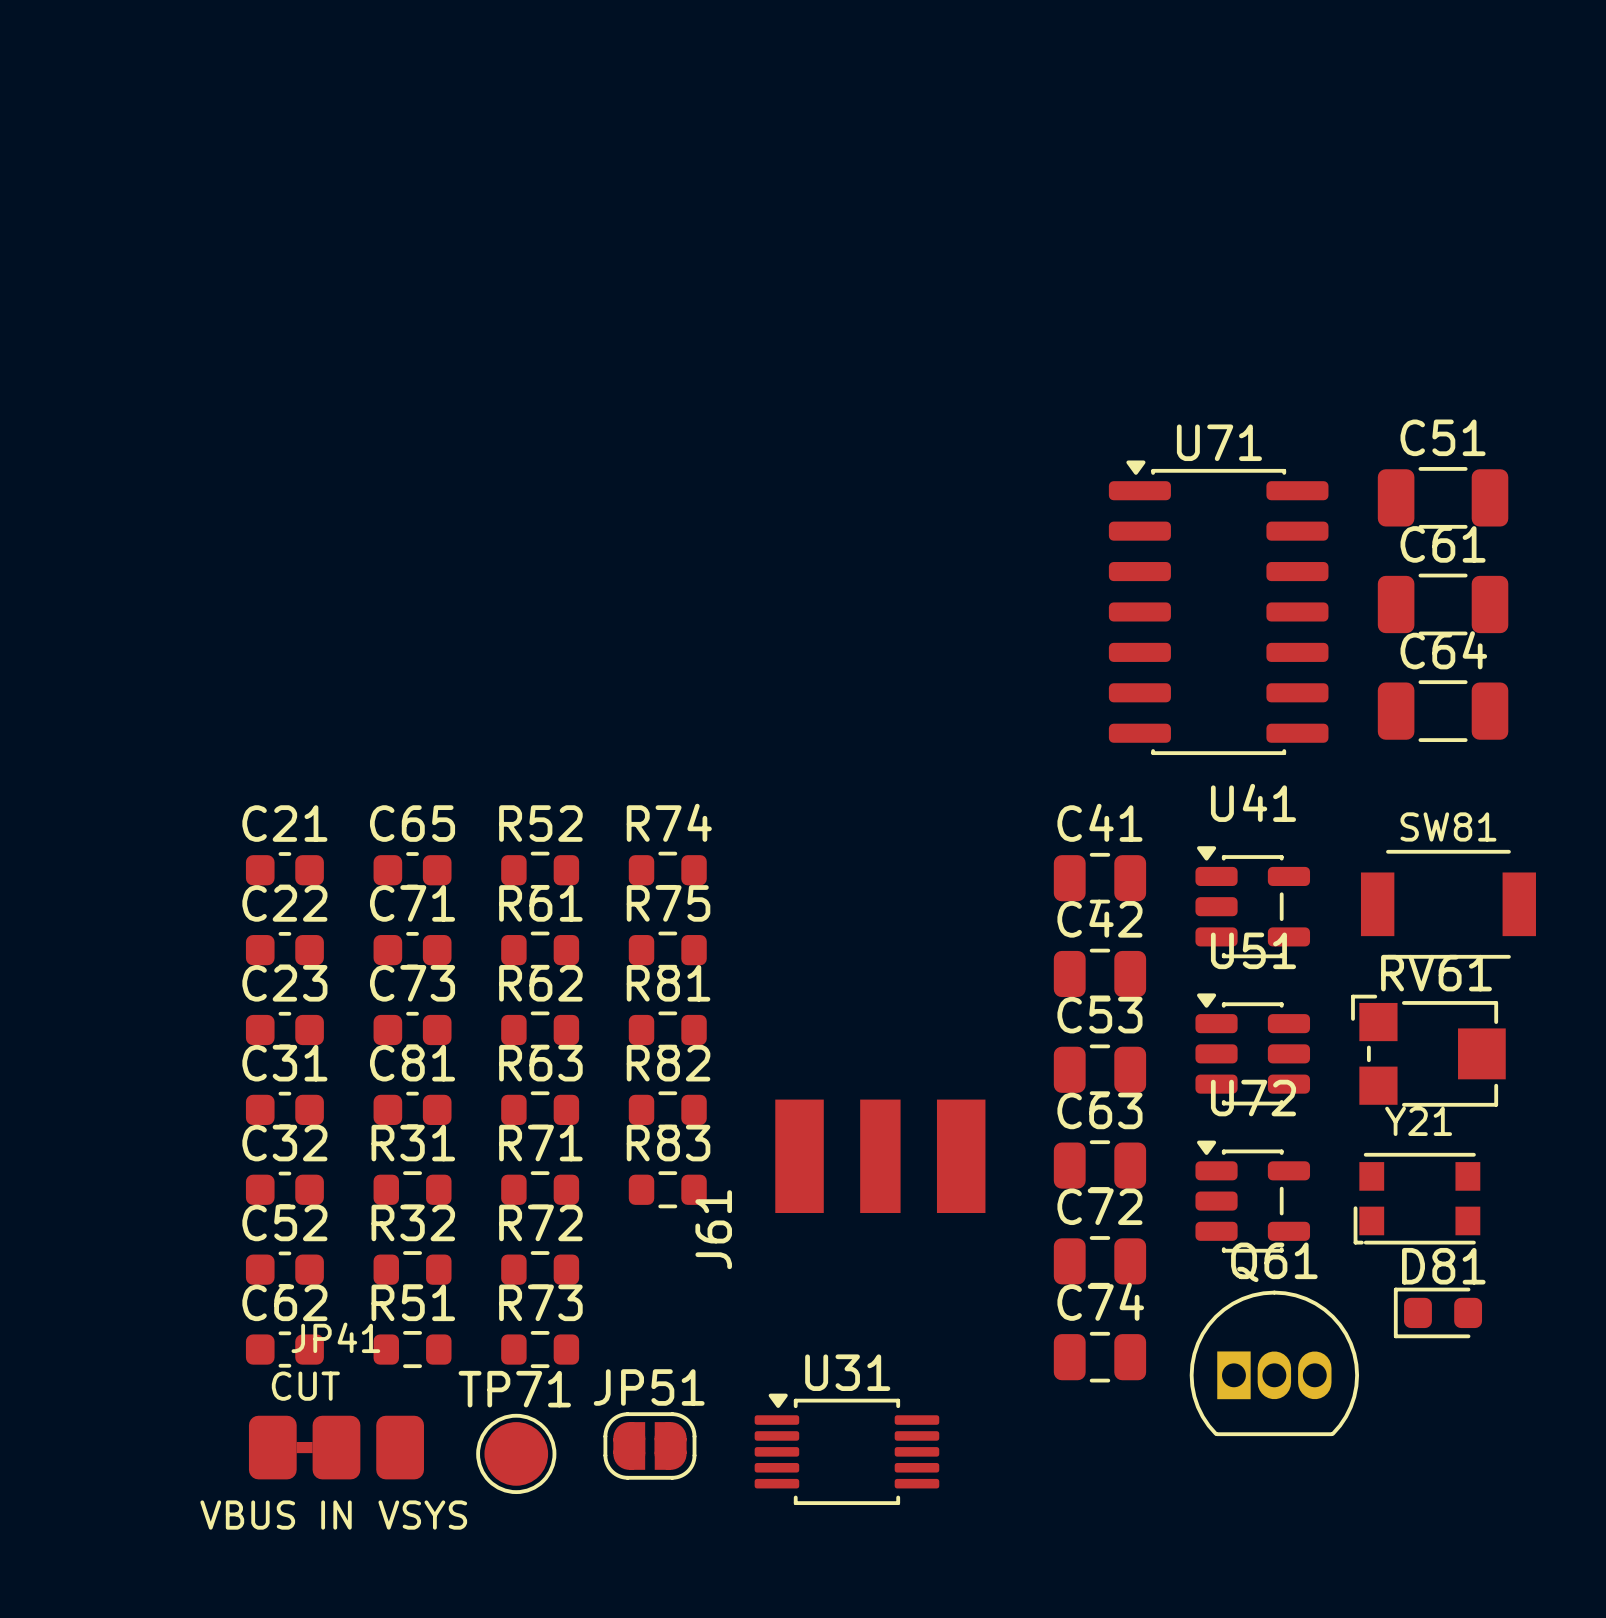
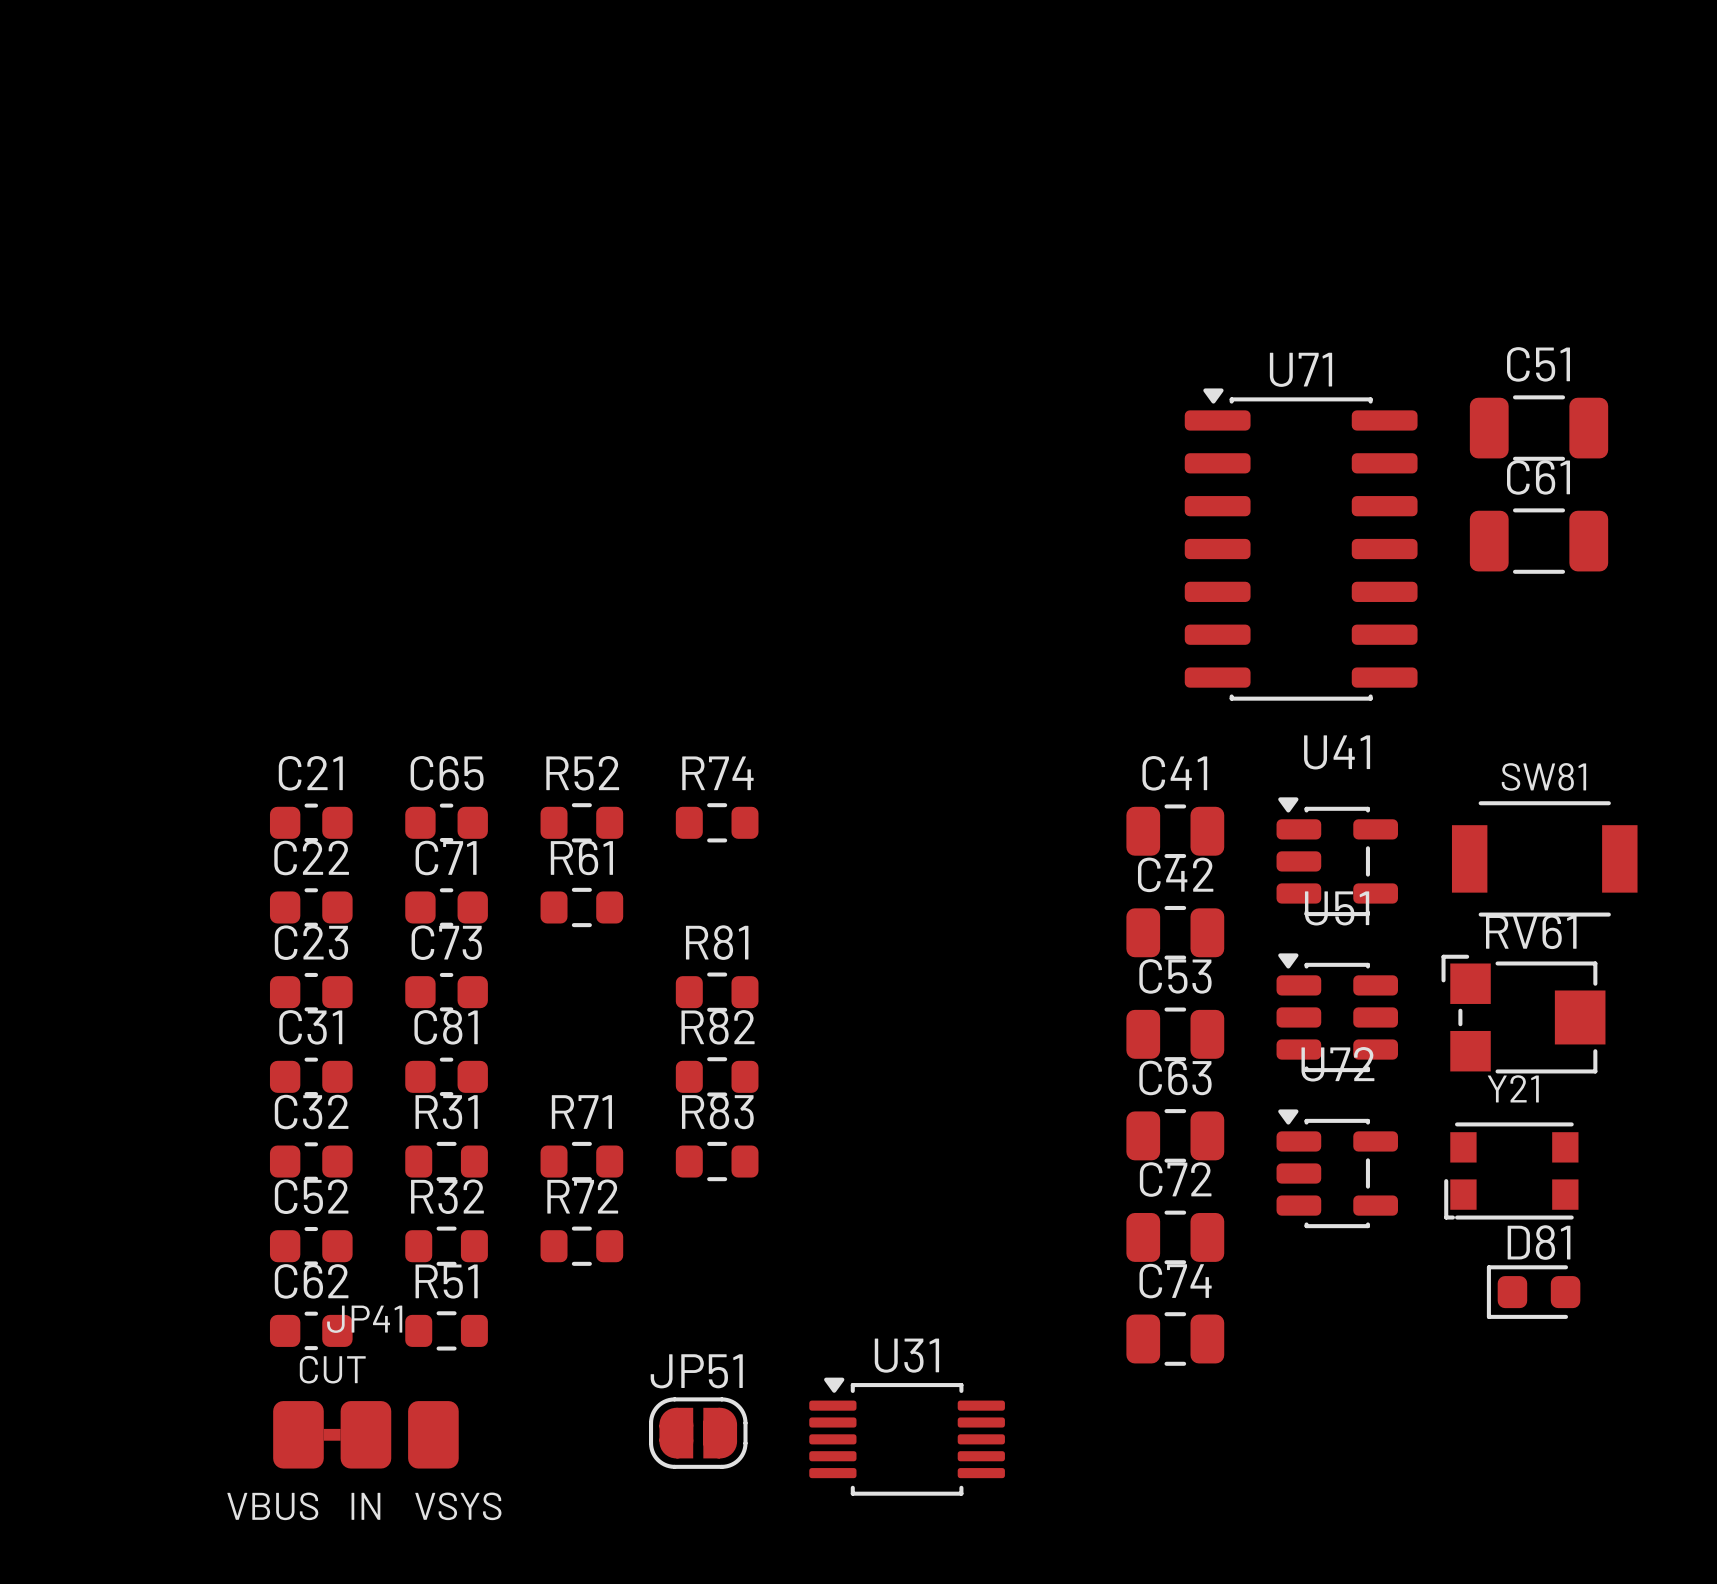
C64: (1443, 711) -> none
R75: (667, 950) -> none
R62: (540, 1030) -> none
R63: (540, 1109) -> none
J61: (880, 1156) -> none
R73: (540, 1349) -> none
Q61: (1274, 1363) -> none
TP71: (516, 1453) -> none

